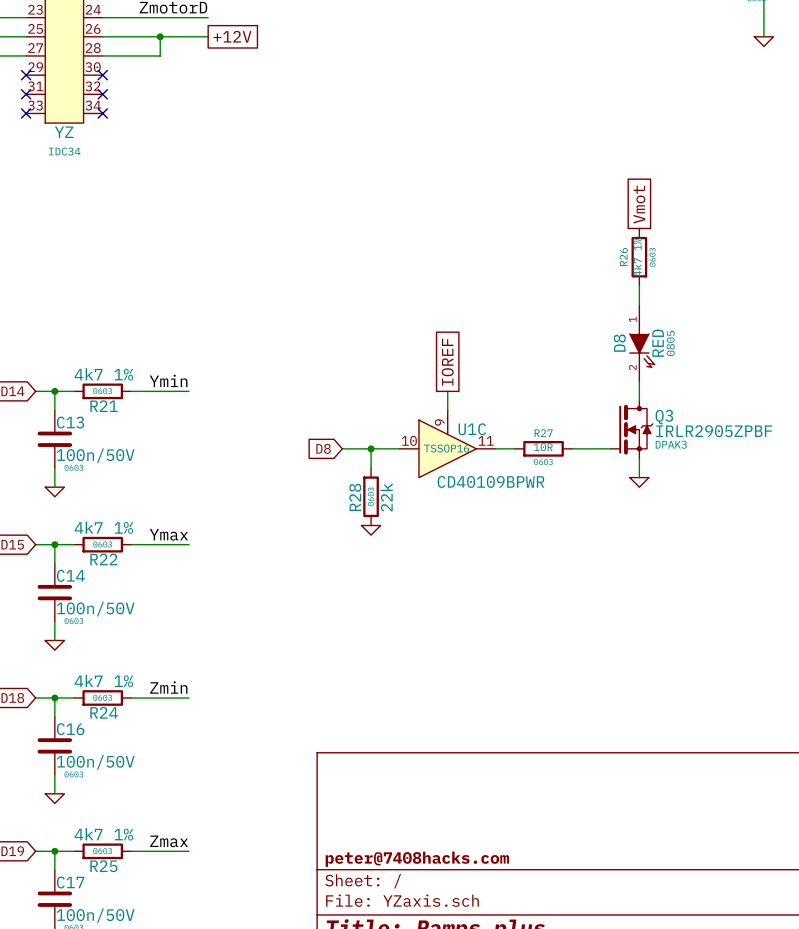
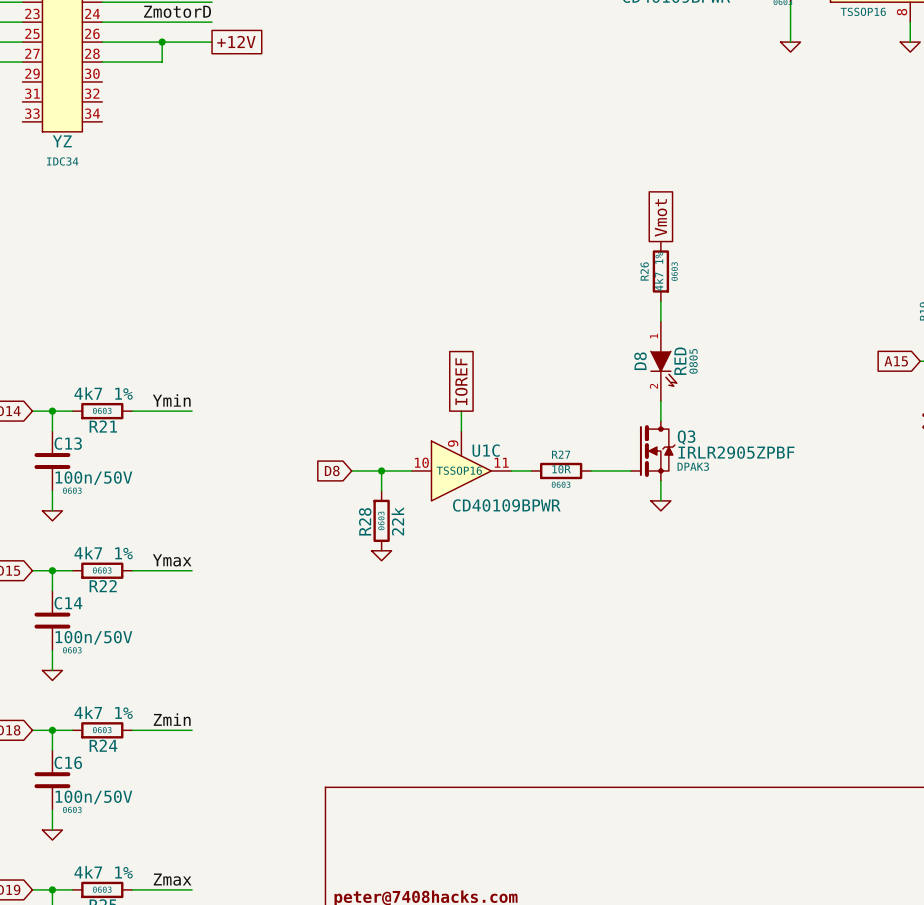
no-connect mark: (26, 75) -> none
no-connect mark: (102, 75) -> none
no-connect mark: (26, 94) -> none
no-connect mark: (102, 94) -> none
no-connect mark: (26, 113) -> none
no-connect mark: (102, 113) -> none

